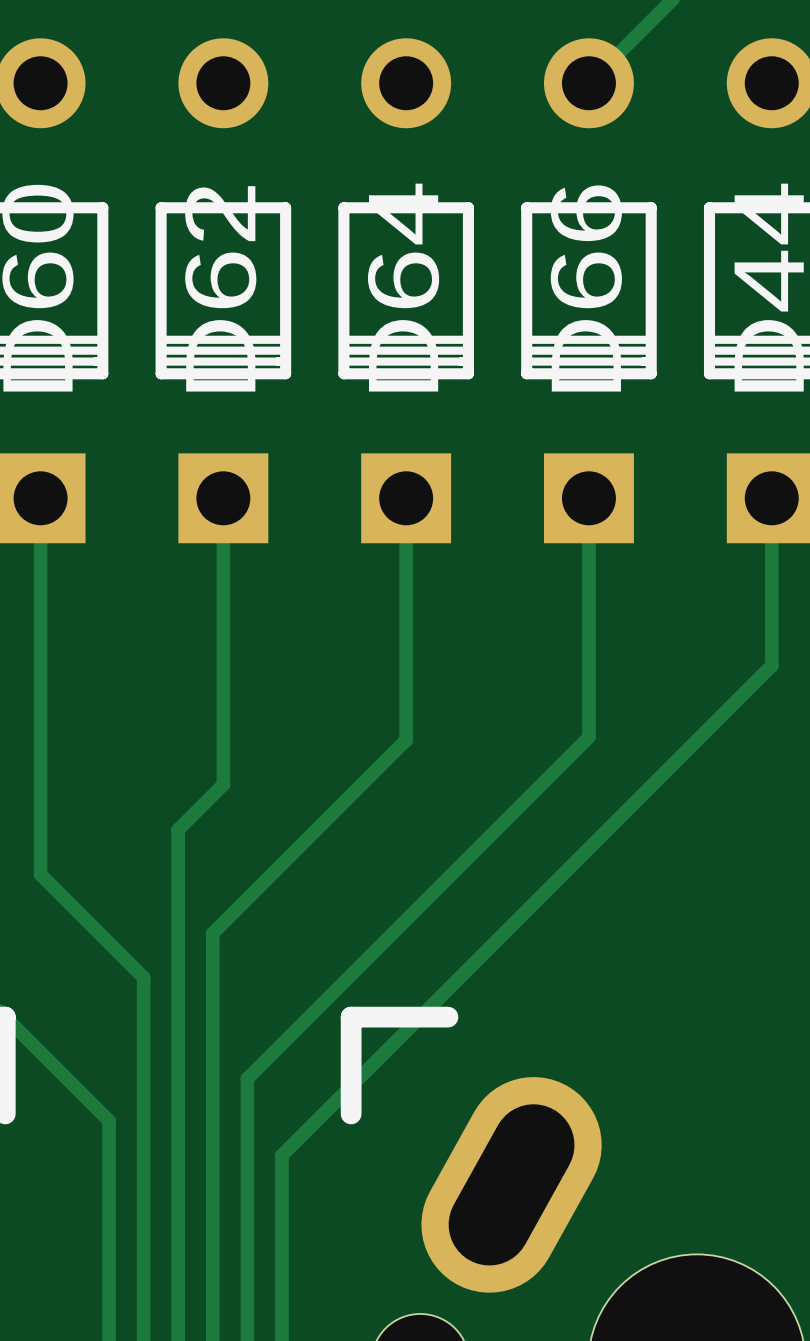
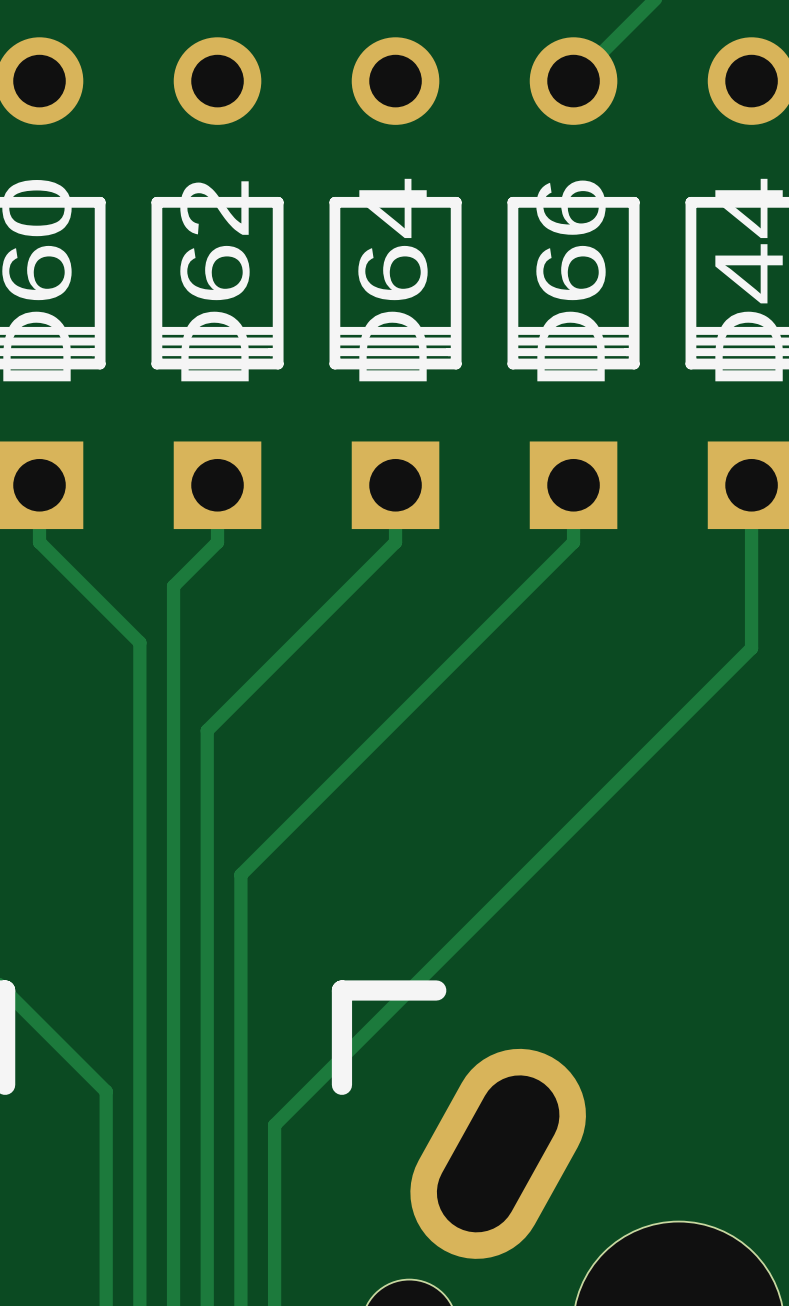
track: (40, 556) (40, 874) (143, 977) -> (39, 542) (139, 642) (139, 952)
track: (223, 556) (223, 784) (178, 829) -> (217, 542) (173, 586) (173, 808)
track: (406, 556) (406, 740) (212, 933) -> (395, 542) (207, 730) (207, 909)
track: (588, 556) (588, 737) (247, 1078) -> (573, 542) (240, 874) (240, 1050)

